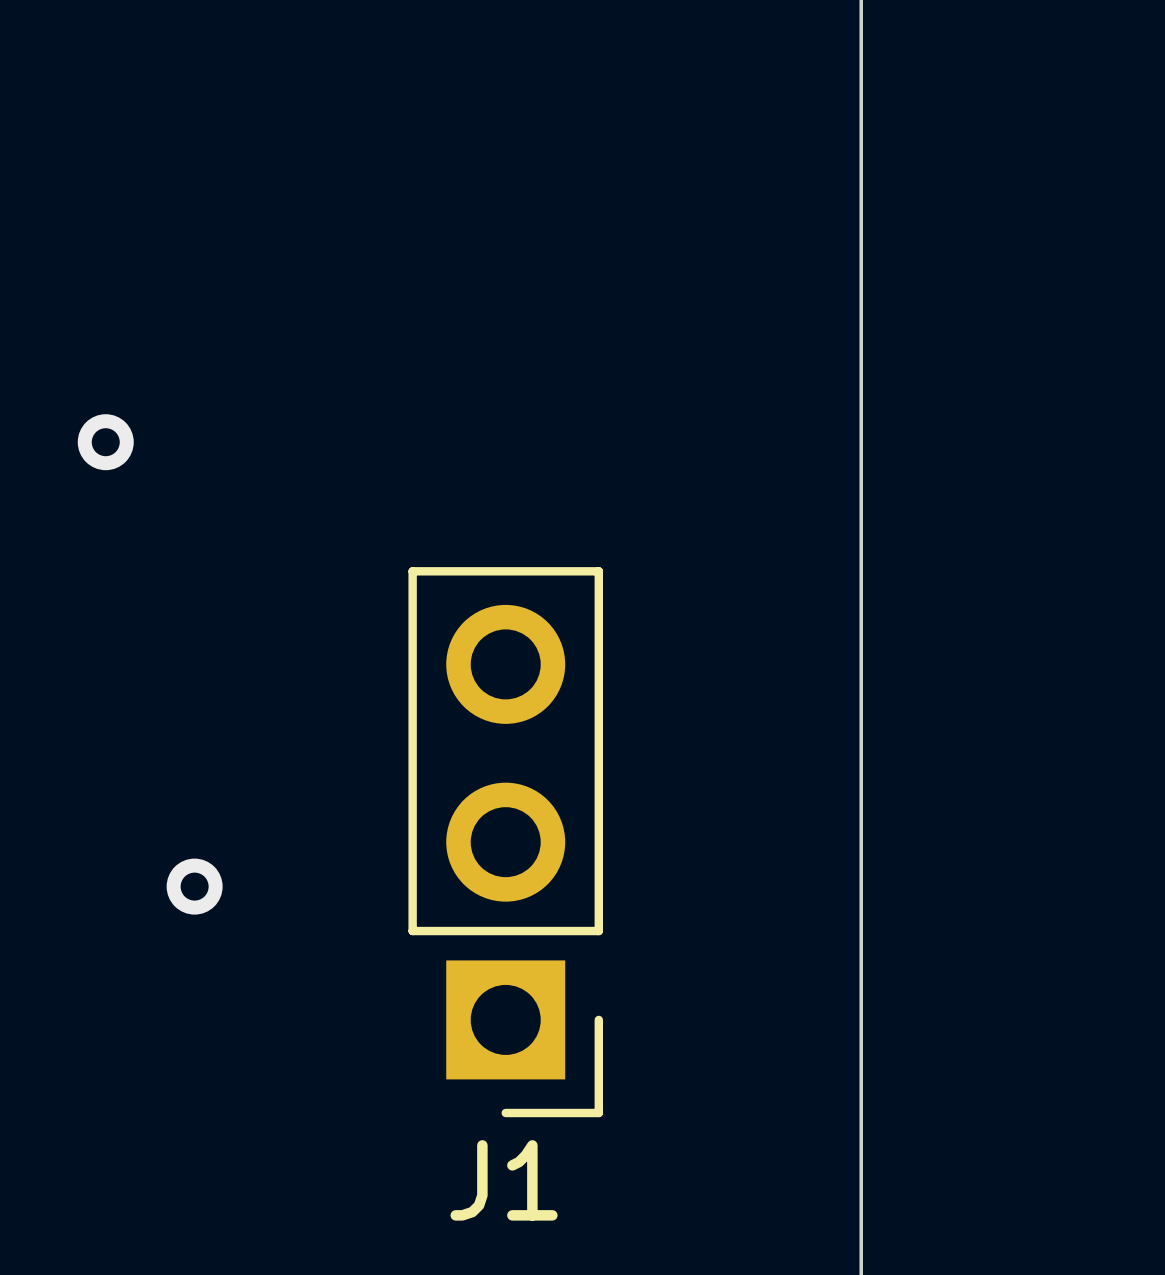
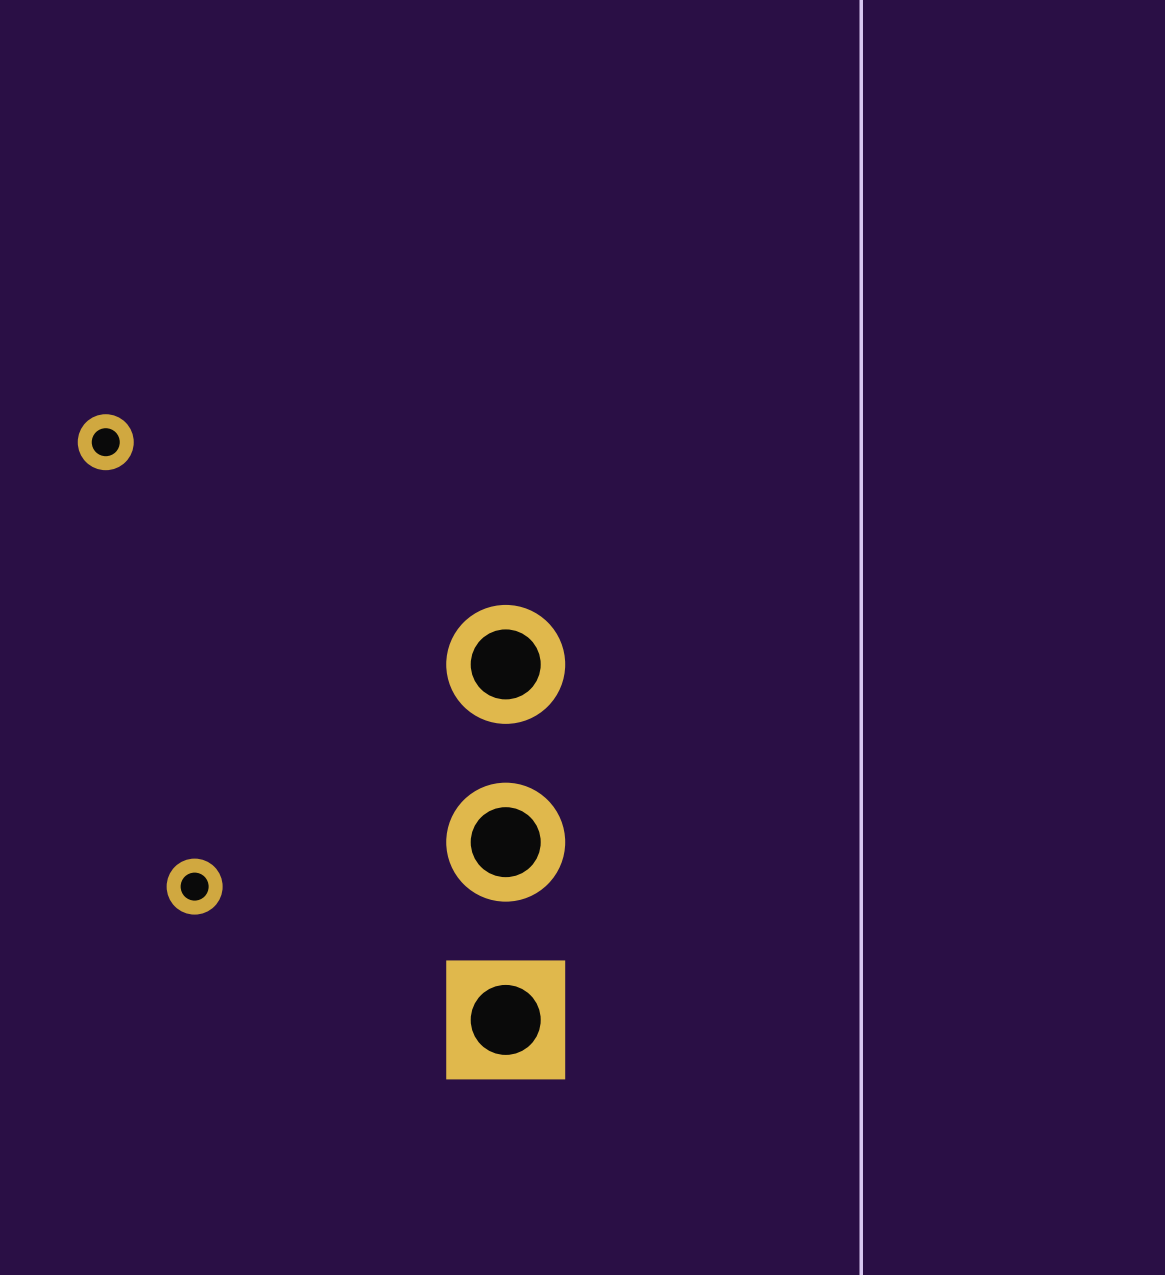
J1 side: bottom (505, 842) -> top (505, 842)

